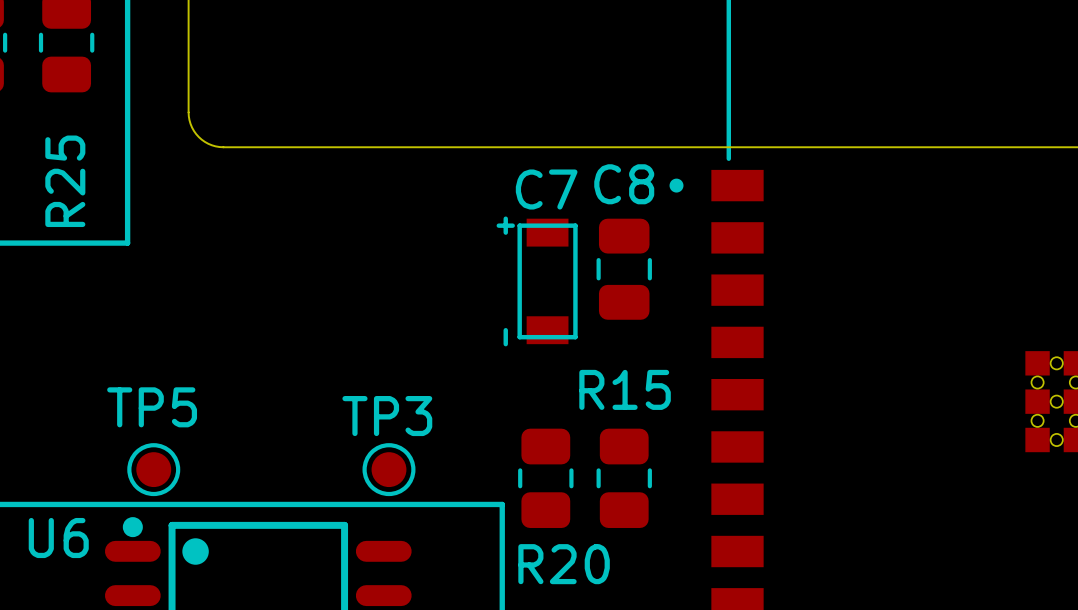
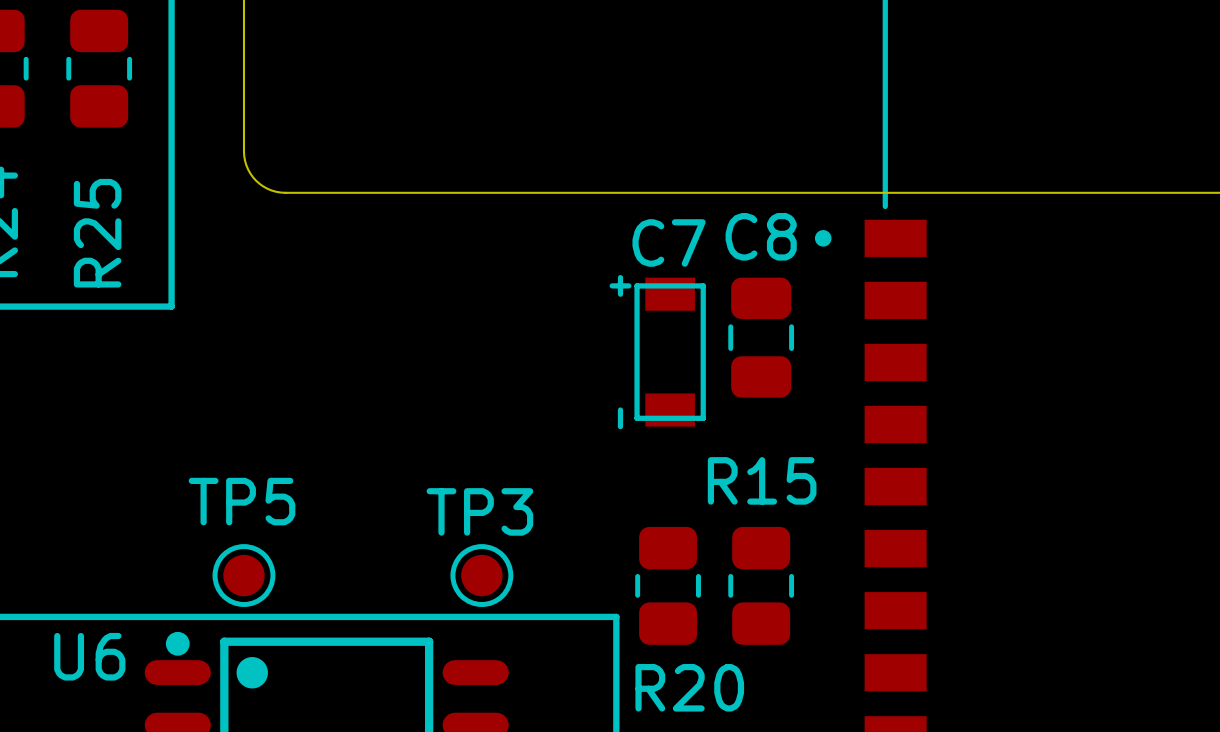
TP5 position: (153, 469) -> (243, 575)

